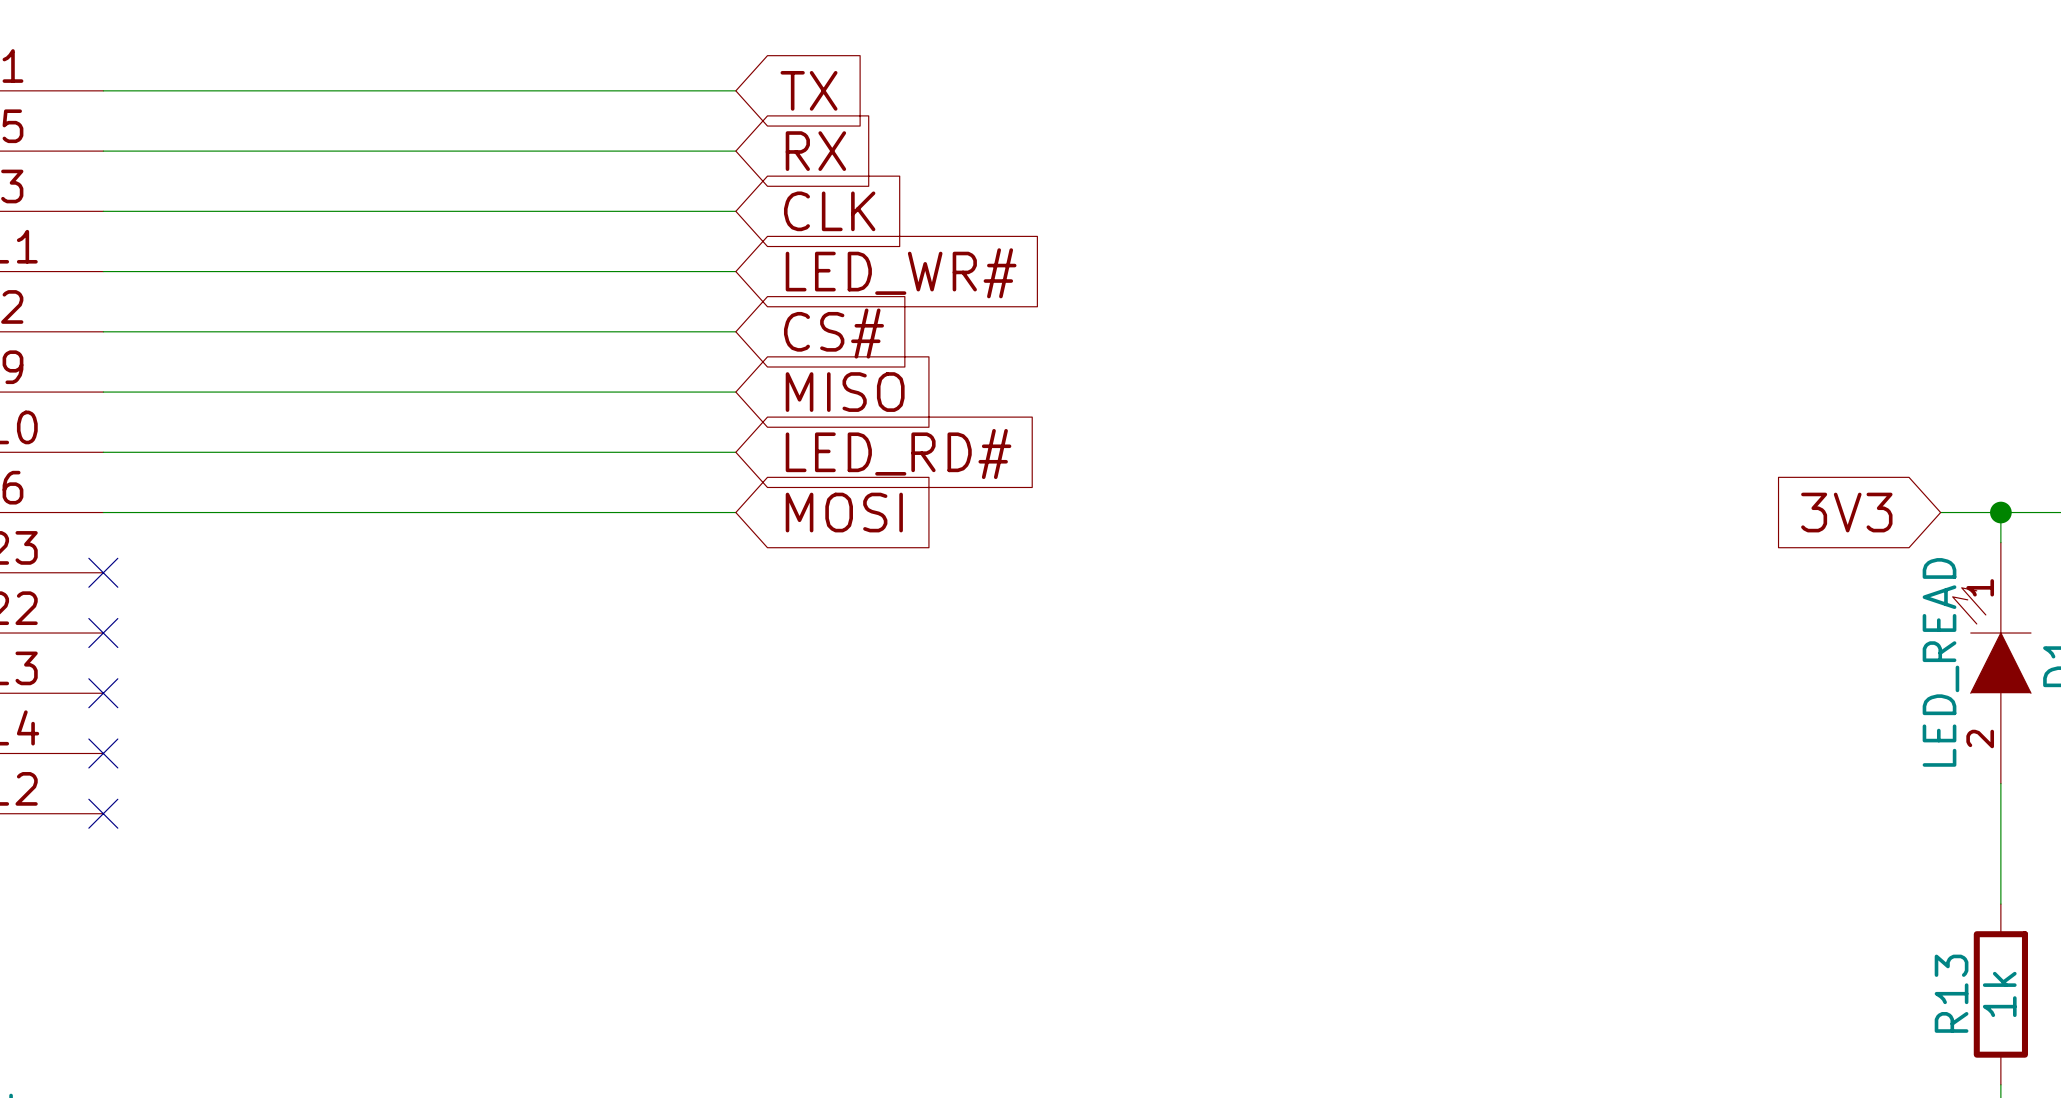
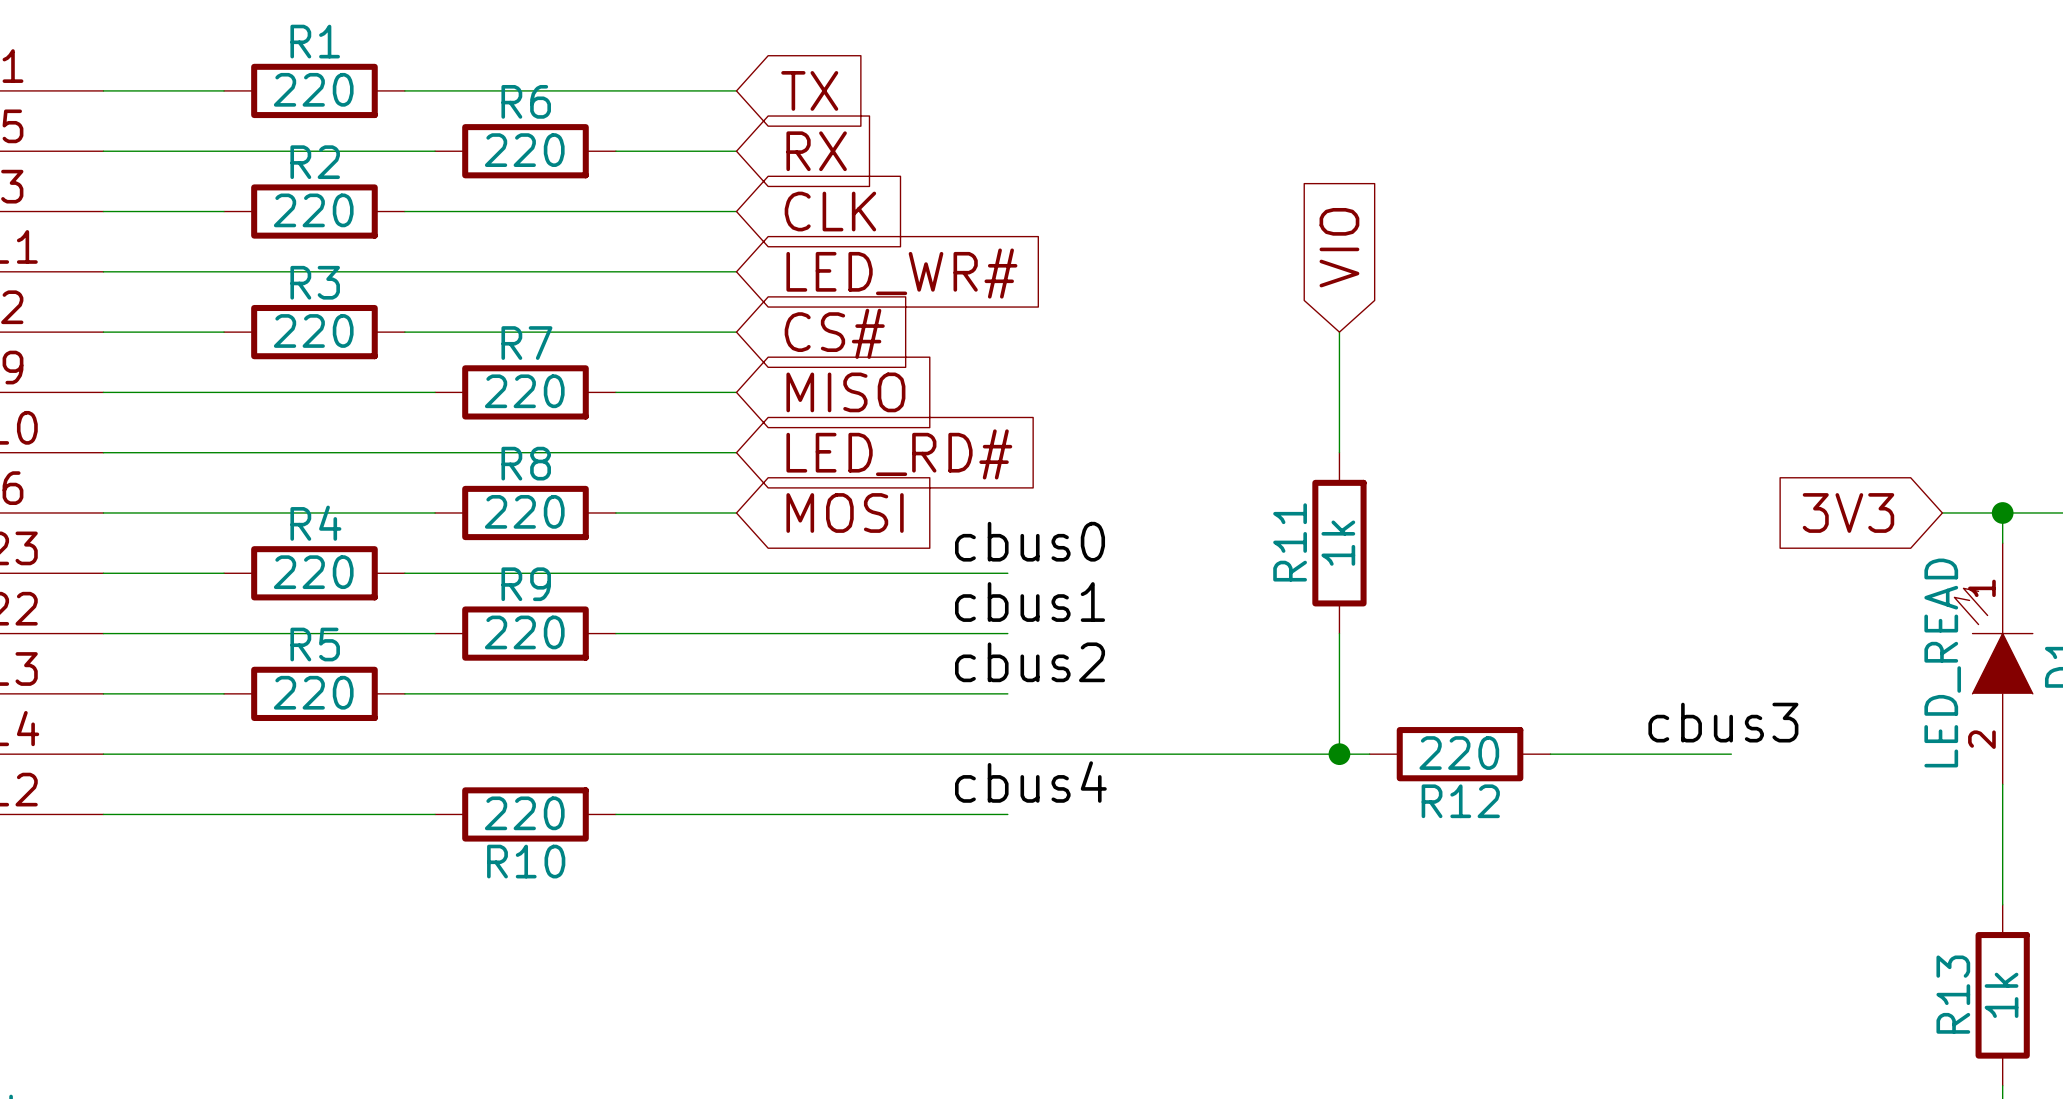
wire: (223, 90) (404, 90) -> none
R1: none -> 220 (314, 90)
wire: (434, 151) (615, 151) -> none
R6: none -> 220 (525, 151)
wire: (223, 211) (404, 211) -> none
R2: none -> 220 (314, 211)
global label: none -> VIO (1339, 247)
wire: (223, 331) (404, 331) -> none
R3: none -> 220 (314, 332)
wire: none -> (1339, 332) (1339, 452)
wire: (434, 392) (615, 392) -> none
R7: none -> 220 (525, 392)
wire: (434, 512) (615, 512) -> none
R8: none -> 220 (525, 512)
label: none -> cbus0 (1030, 541)
R11: none -> 1k (1339, 543)
wire: none -> (103, 573) (224, 573)
no-connect mark: (103, 572) -> none
R4: none -> 220 (314, 573)
wire: none -> (404, 573) (1007, 573)
label: none -> cbus1 (1030, 602)
wire: none -> (103, 633) (435, 633)
no-connect mark: (103, 633) -> none
R9: none -> 220 (525, 633)
wire: none -> (615, 633) (1007, 633)
wire: none -> (1339, 633) (1339, 754)
label: none -> cbus2 (1030, 662)
wire: none -> (103, 693) (224, 693)
no-connect mark: (103, 693) -> none
R5: none -> 220 (314, 693)
wire: none -> (404, 693) (1007, 693)
label: none -> cbus3 (1723, 722)
wire: none -> (103, 754) (1369, 754)
no-connect mark: (103, 753) -> none
junction: none -> (1339, 754)
R12: none -> 220 (1460, 754)
wire: none -> (1550, 754) (1731, 754)
label: none -> cbus4 (1030, 782)
wire: none -> (103, 814) (435, 814)
no-connect mark: (103, 813) -> none
R10: none -> 220 (525, 814)
wire: none -> (615, 814) (1007, 814)

